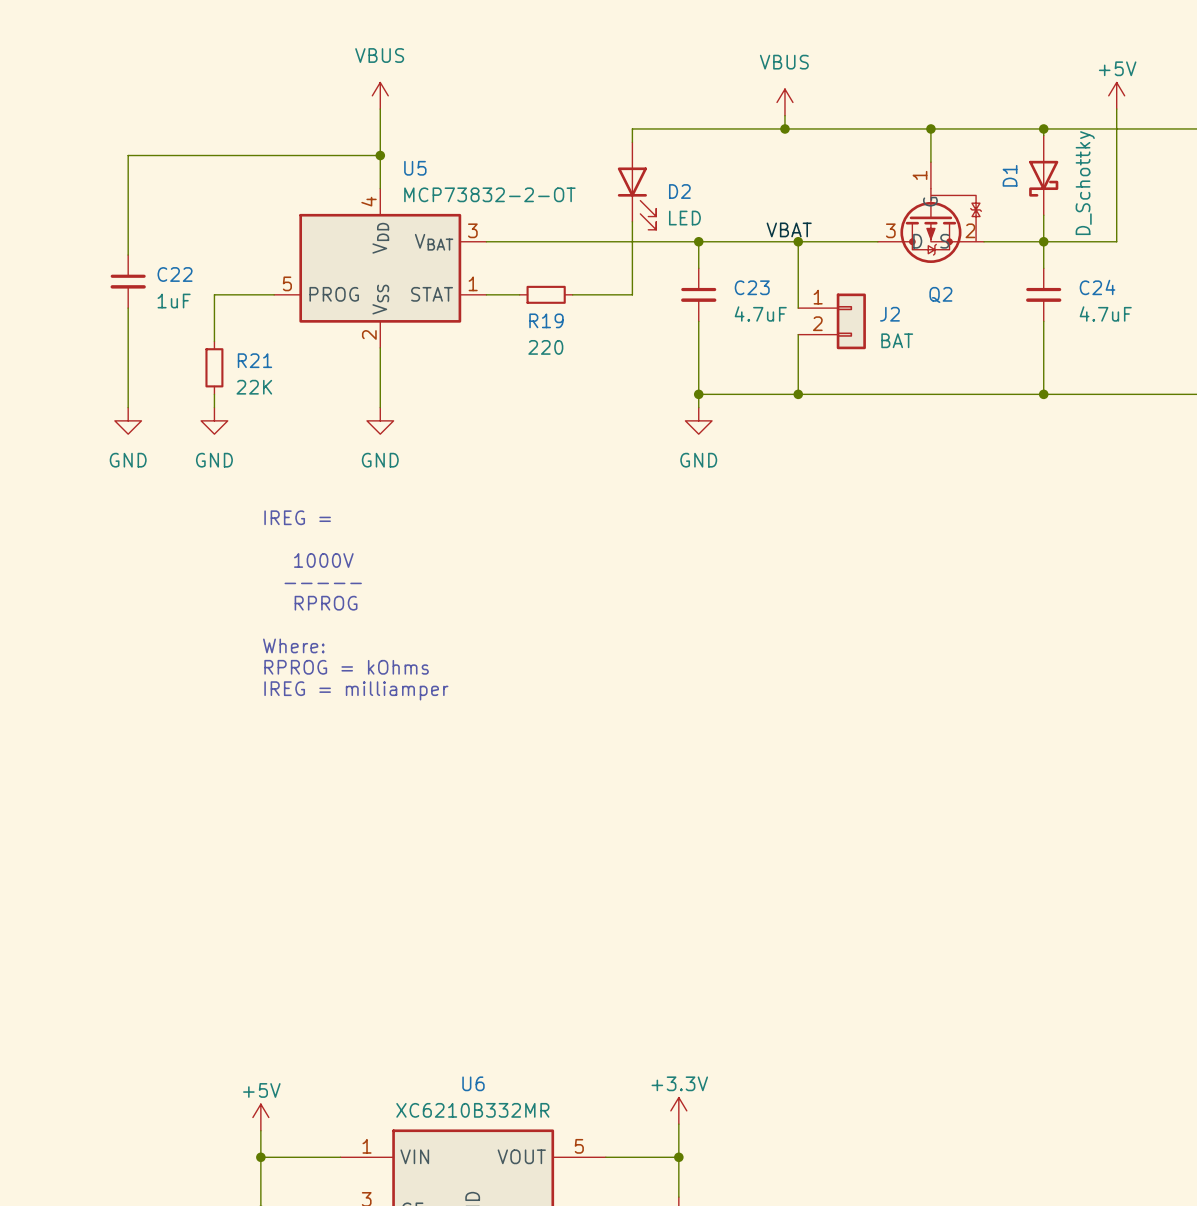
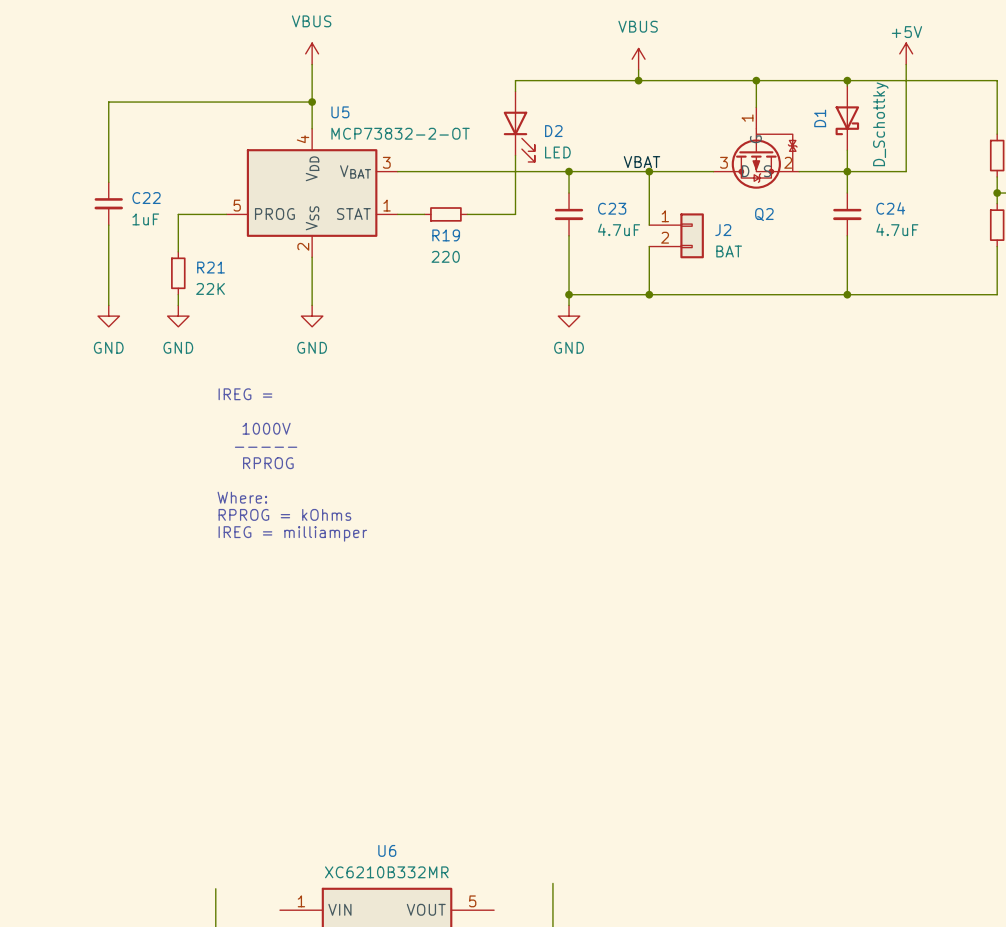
power symbol: +3.3V (678, 1110) -> none
power symbol: +5V (260, 1117) -> none
wire: (260, 1157) (340, 1157) -> none
junction: (260, 1157) -> none
wire: (605, 1157) (678, 1157) -> none
junction: (678, 1157) -> none

